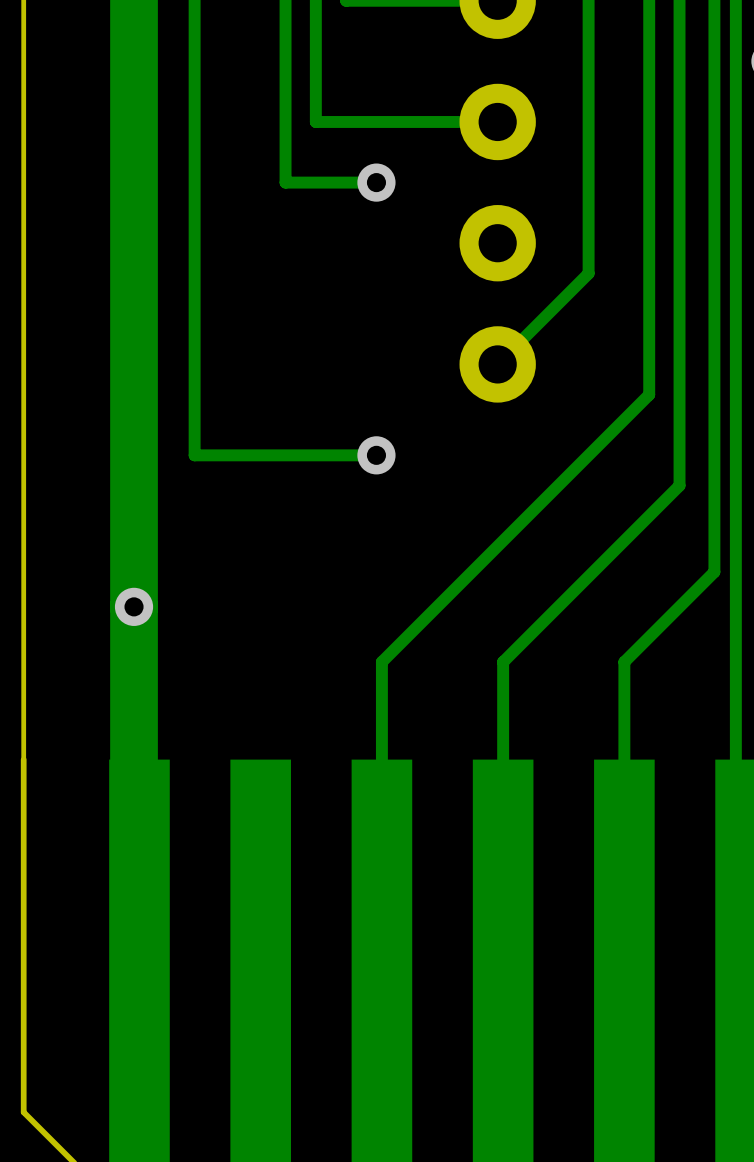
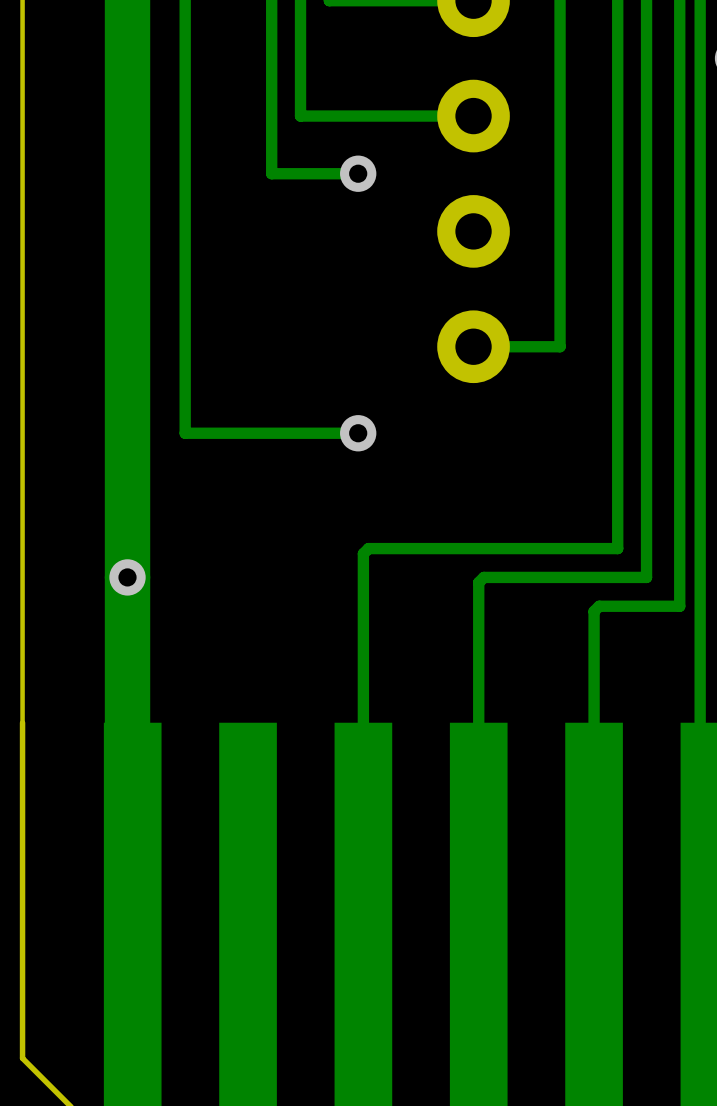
track: (588, 273) (497, 364) -> (560, 260) (560, 346) (473, 346)
track: (649, 394) (381, 662) -> (617, 375) (617, 548) (368, 548) (363, 553) (363, 629)
track: (679, 485) (503, 662) -> (646, 462) (646, 577) (483, 577) (478, 582) (478, 629)
track: (714, 571) (624, 662) -> (679, 544) (679, 606) (599, 606) (594, 611) (594, 629)

